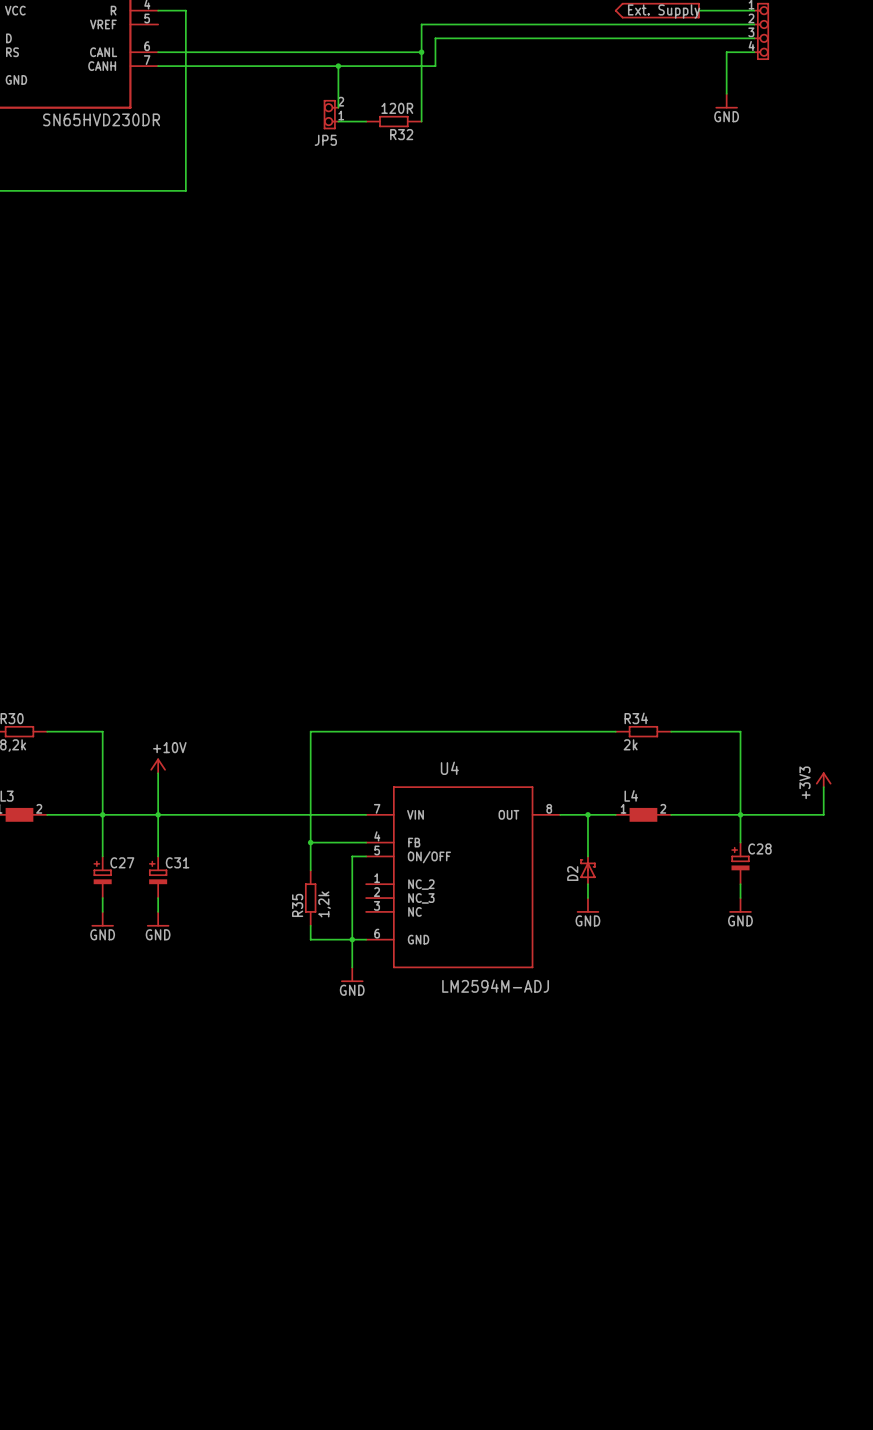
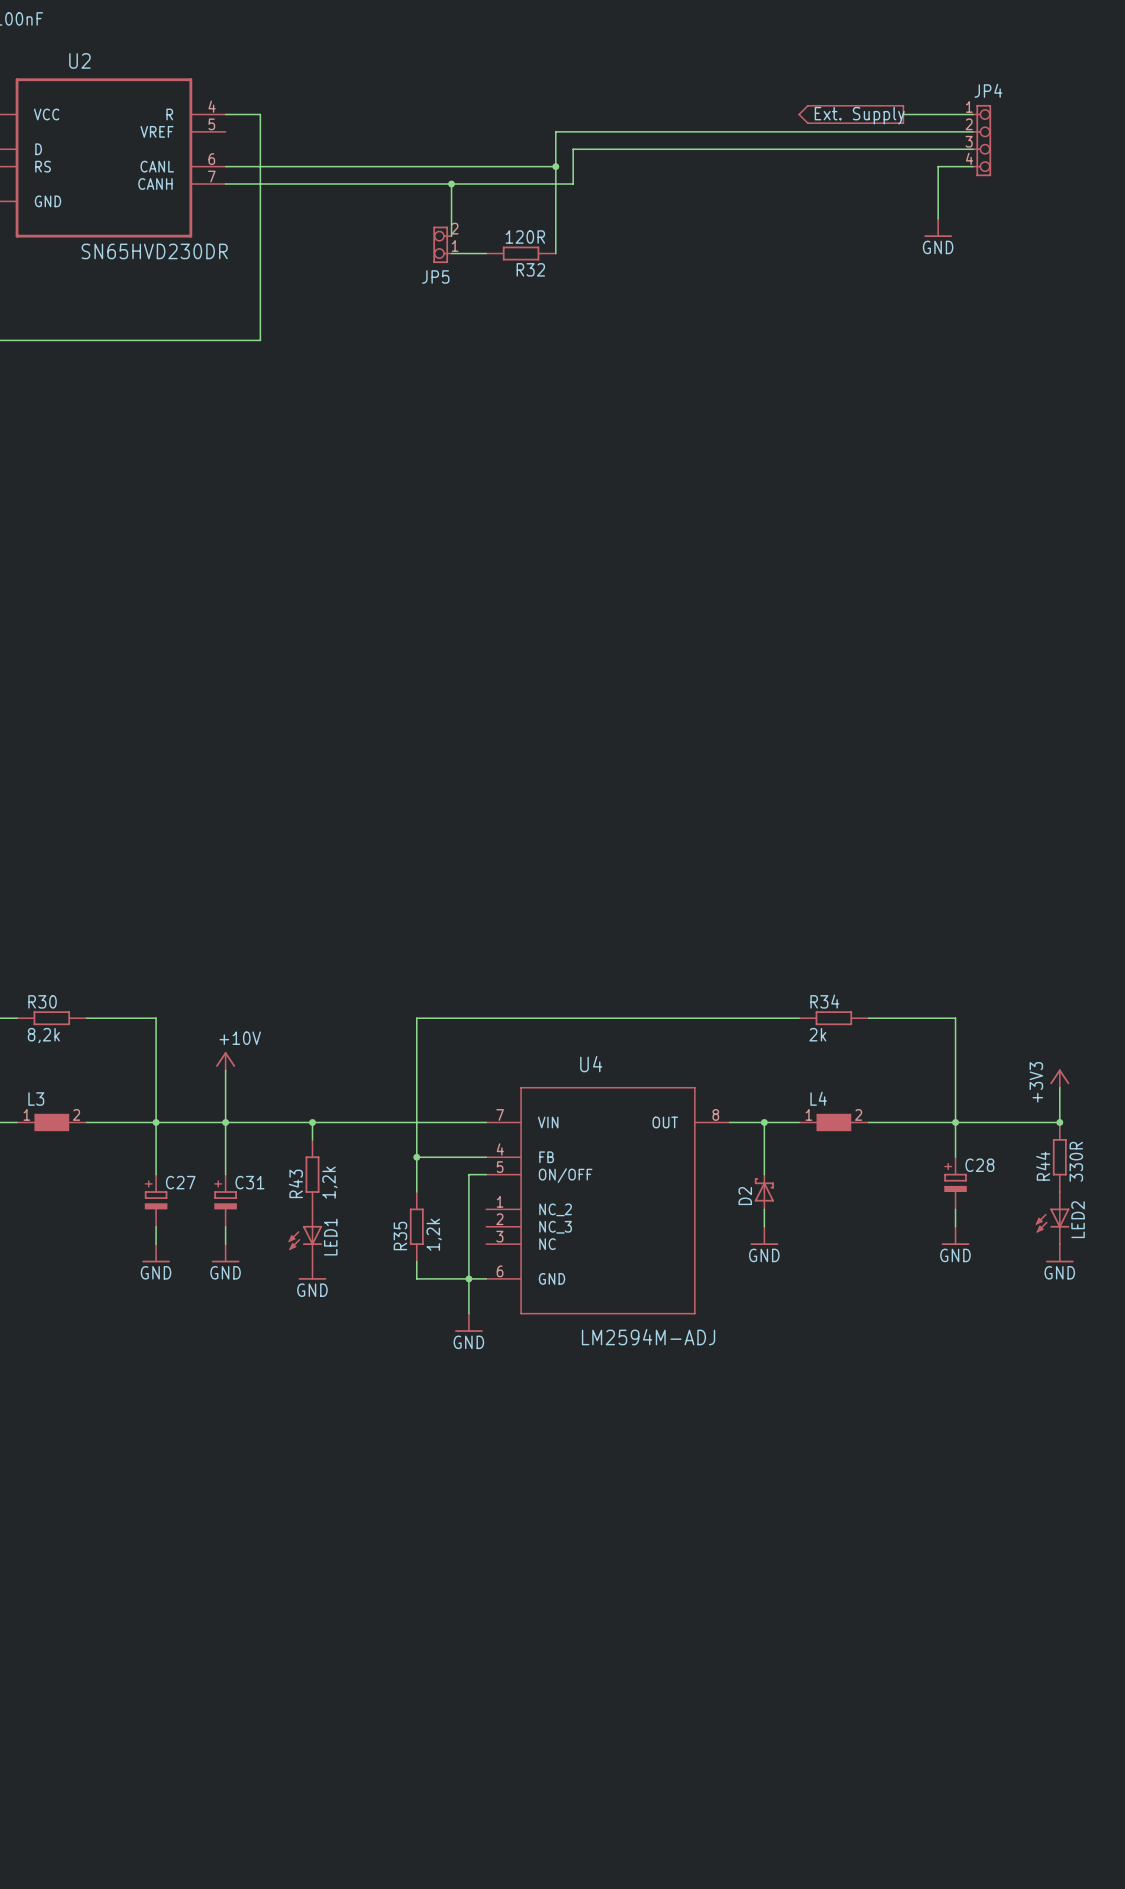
wire: none -> (312, 1122) (312, 1139)
junction: none -> (312, 1122)
junction: none -> (1059, 1122)
R44: none -> 330R (1059, 1157)
R43: none -> 1,2k (312, 1174)
LED2: none -> (1052, 1218)
LED1: none -> (305, 1235)
power symbol: none -> GND (1059, 1253)
power symbol: none -> GND (312, 1270)

